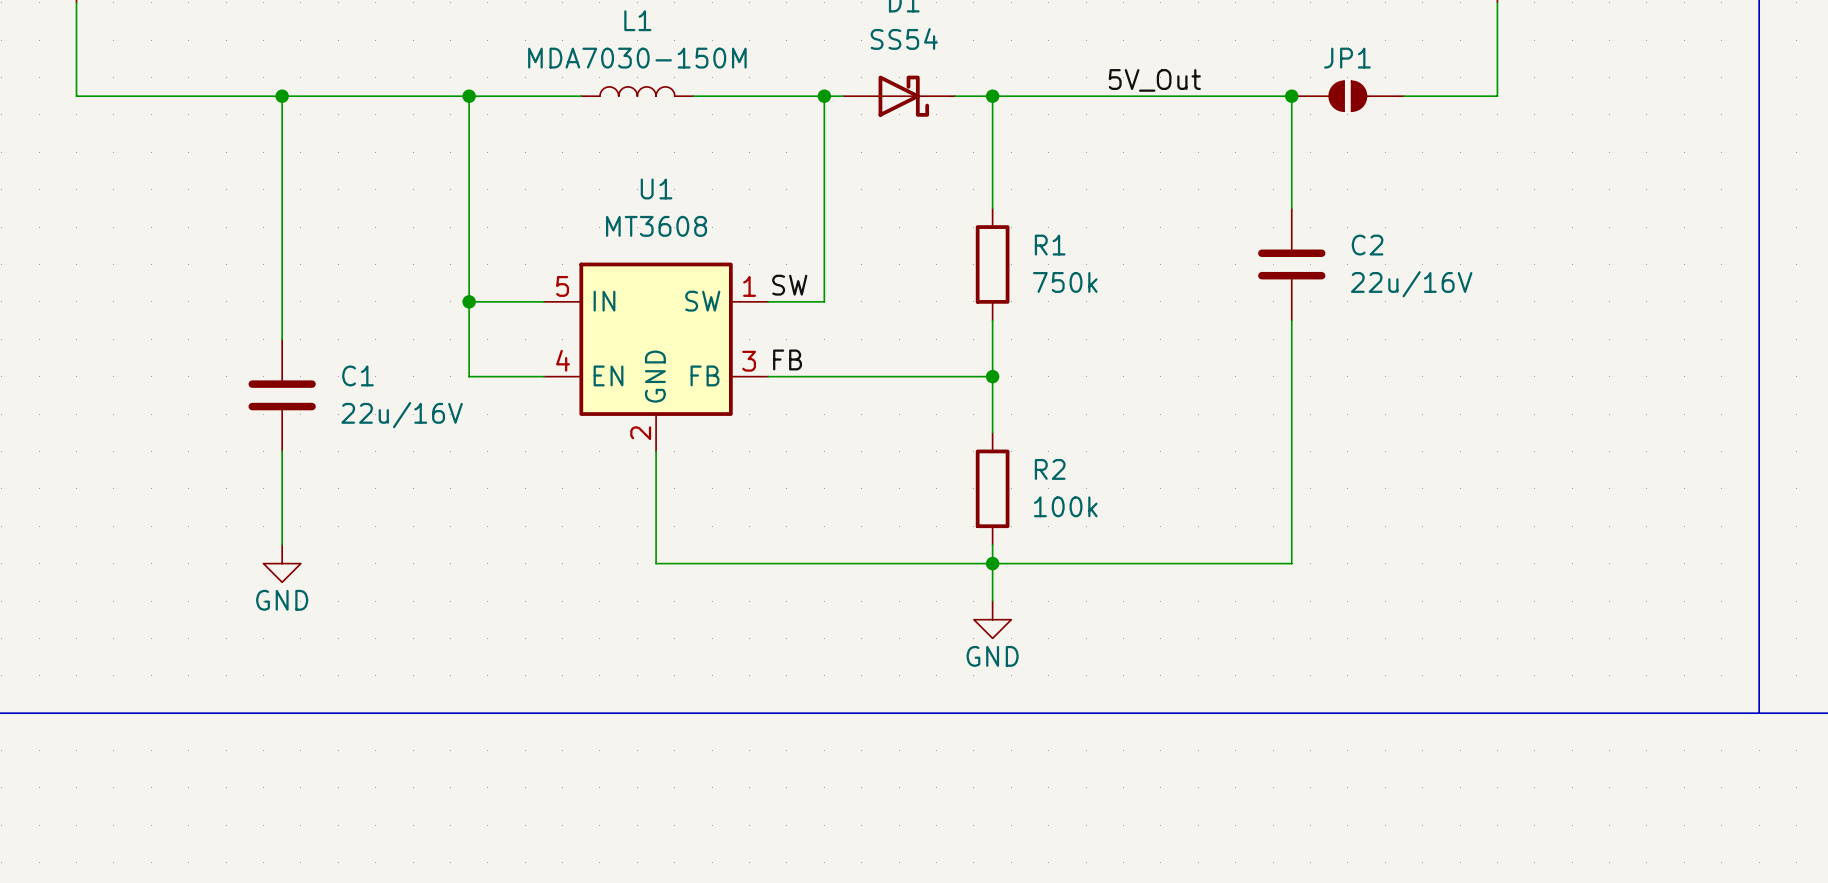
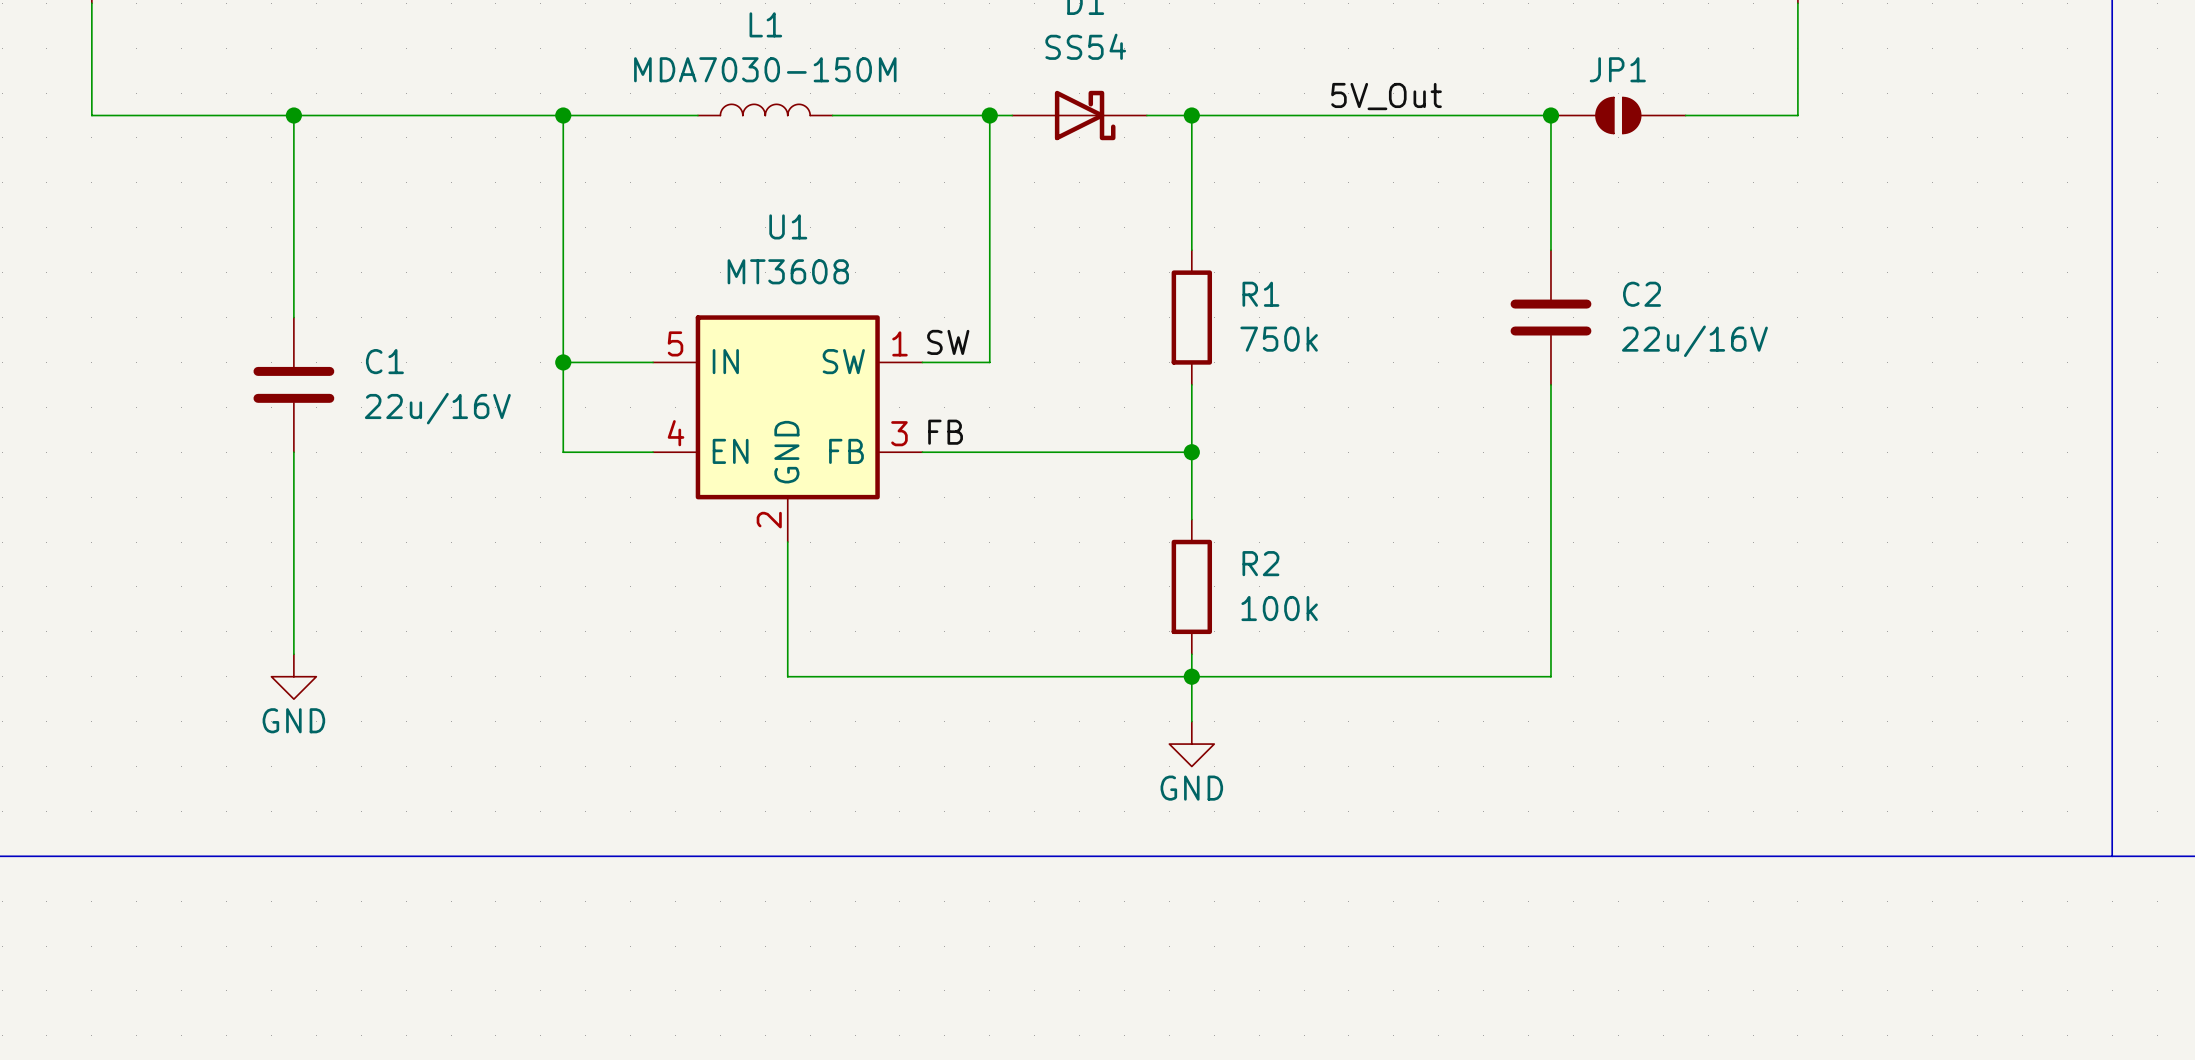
wire: none -> (293, 115) (293, 317)
wire: (282, 96) (282, 339) -> none
junction position: (282, 96) -> (293, 115)
wire: none -> (293, 452) (293, 654)
C1 position: (282, 395) -> (293, 384)
wire: (282, 451) (282, 544) -> none
power symbol position: GND (282, 563) -> GND (293, 676)

